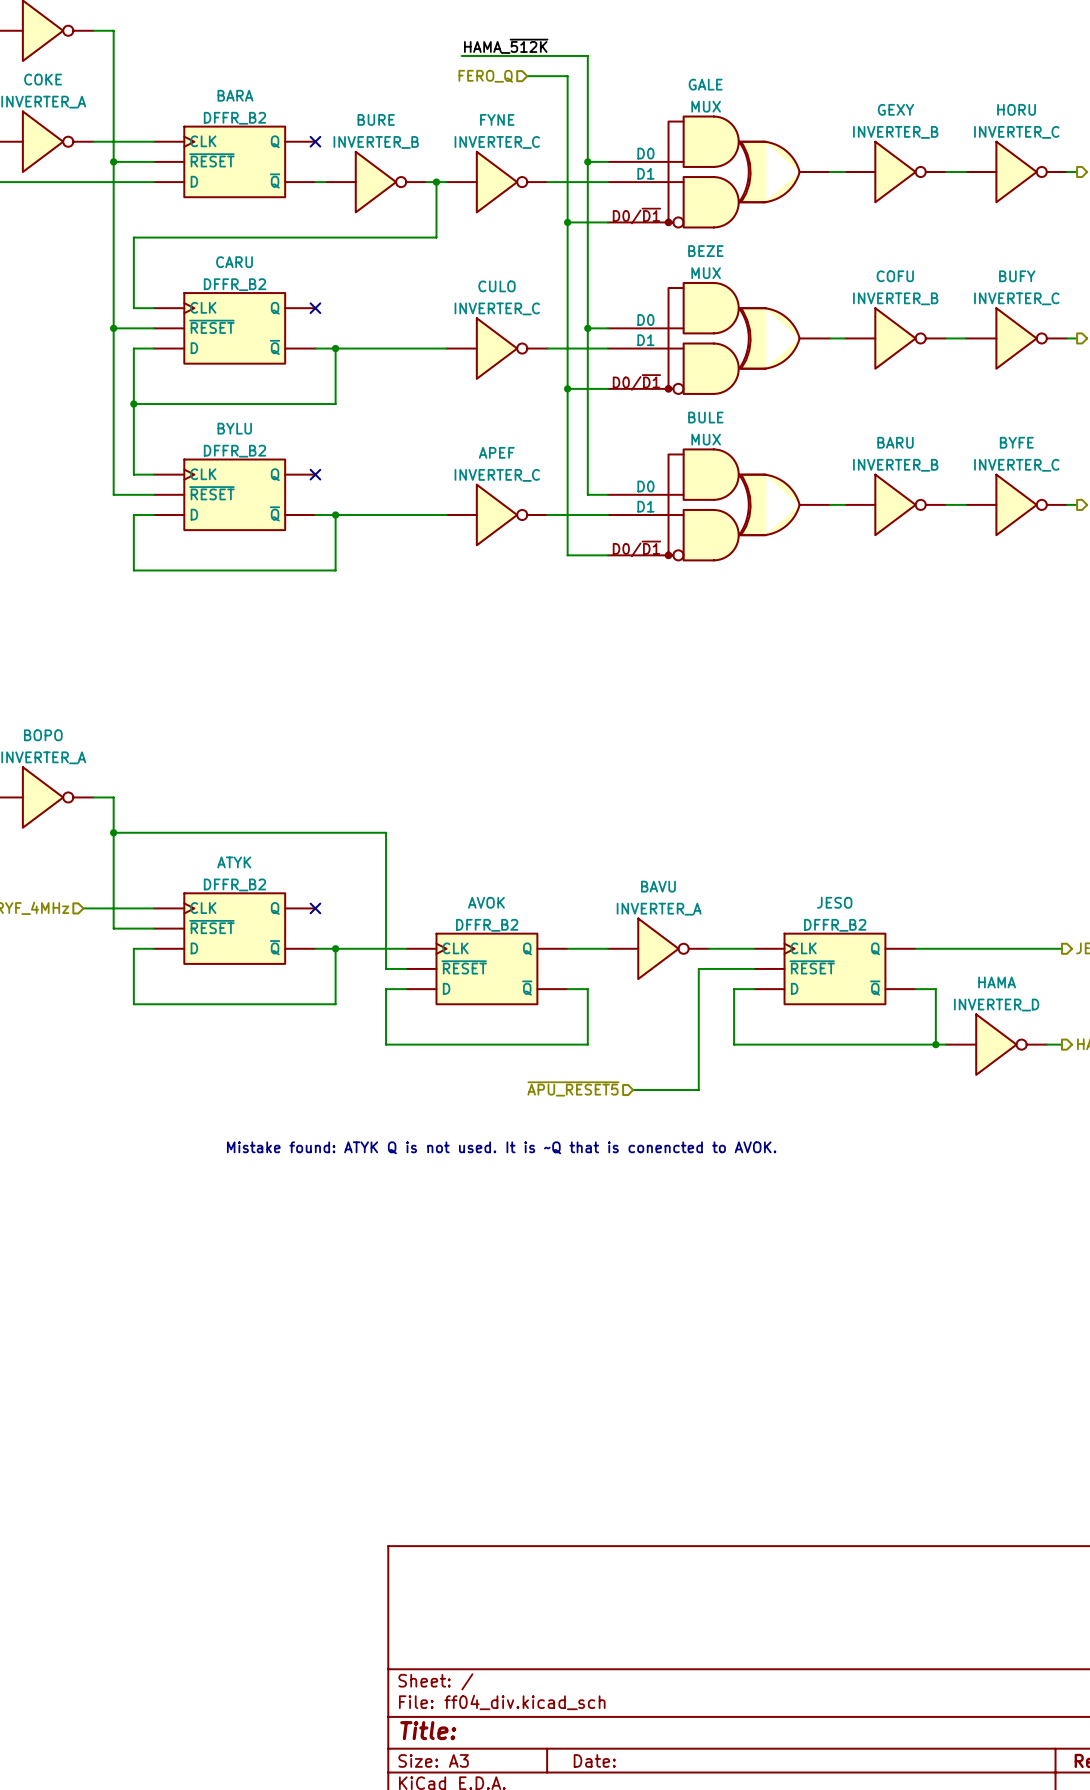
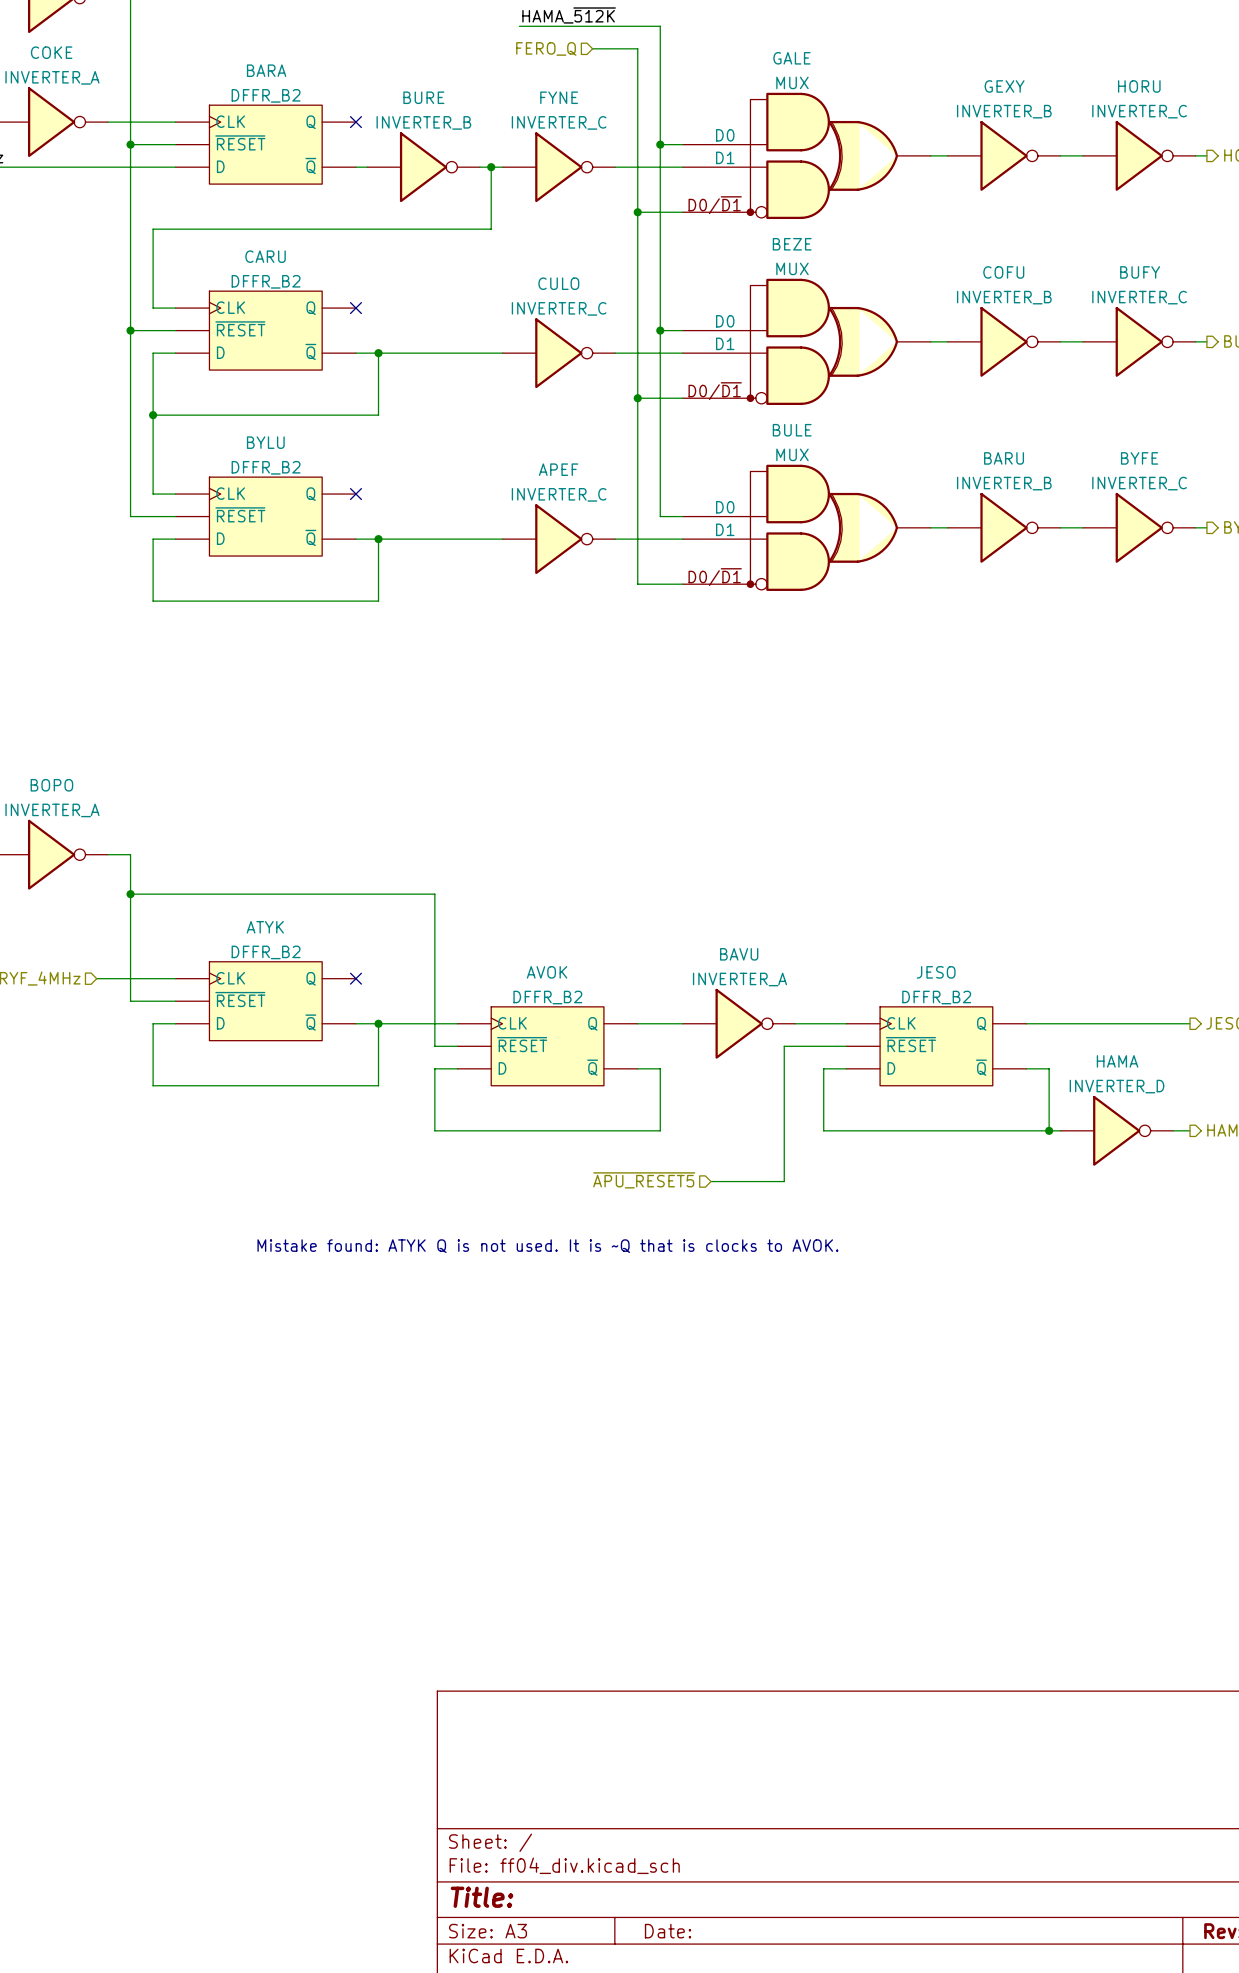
text: Mistake found: ATYK Q is not used. It is ~Q that is conencted to AVOK. (501, 1147) -> Mistake found: ATYK Q is not used. It is ~Q that is clocks to AVOK. (547, 1246)

